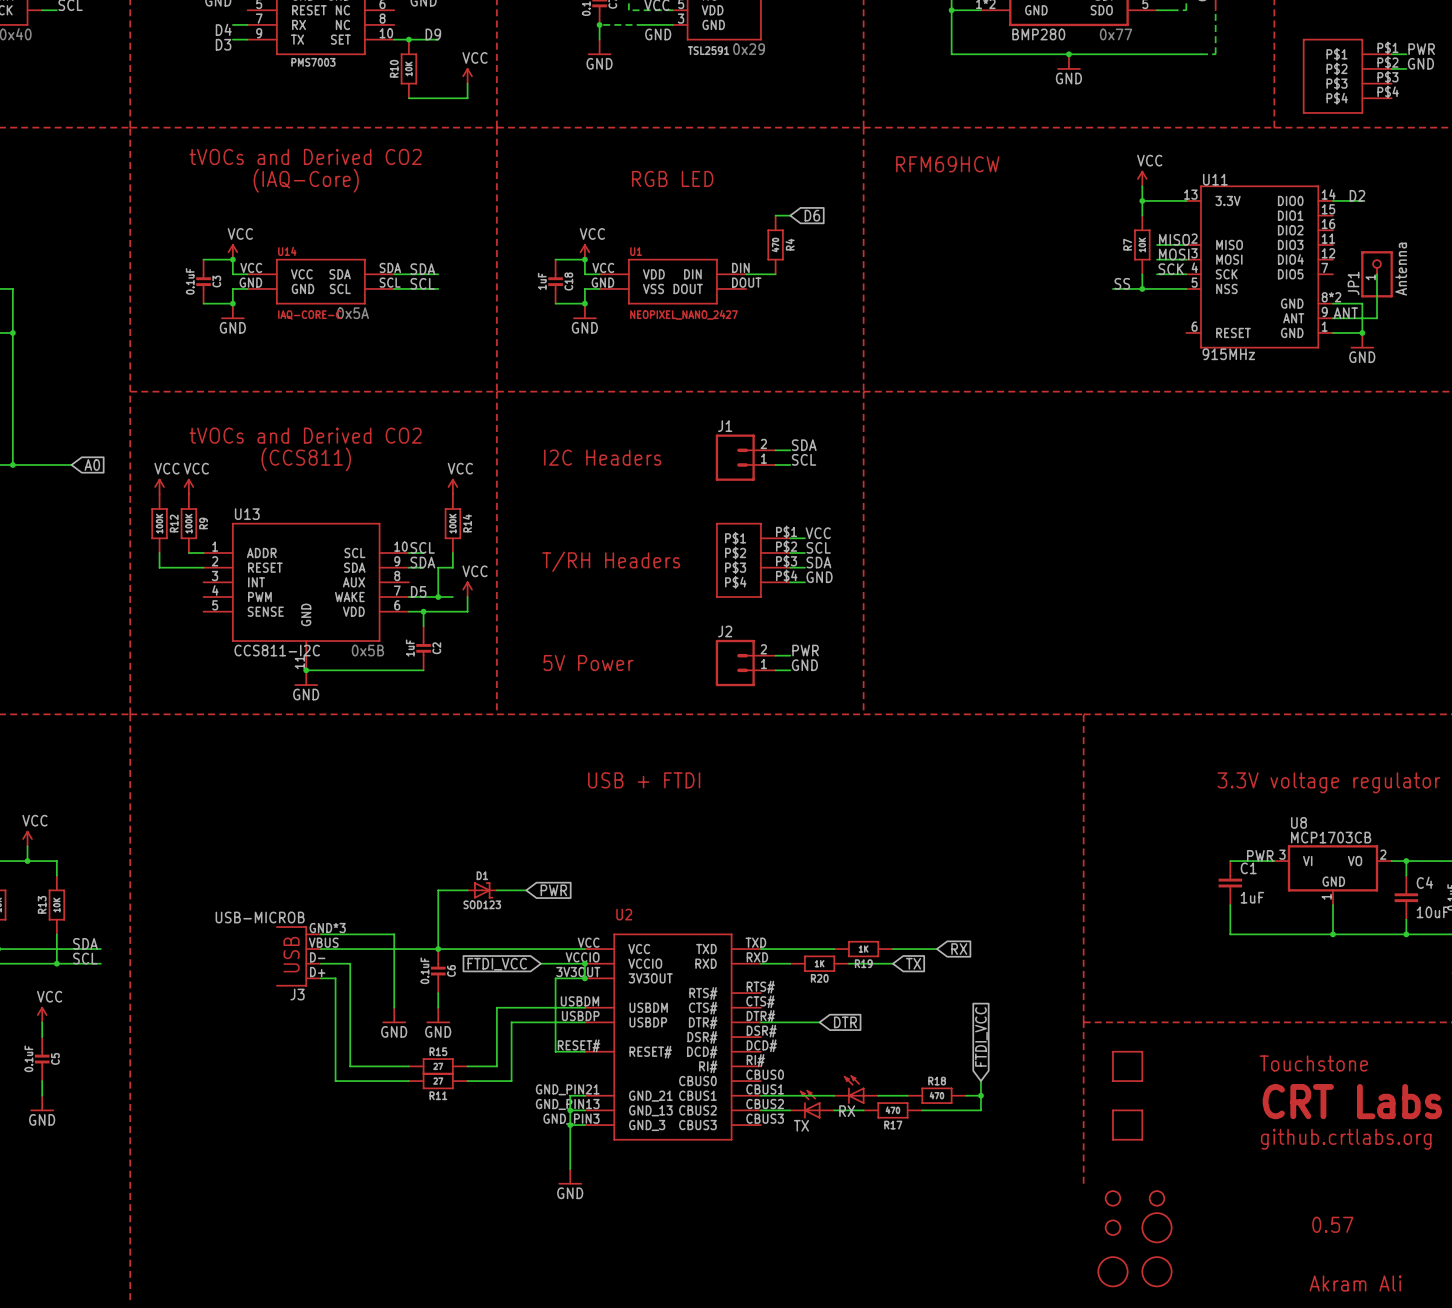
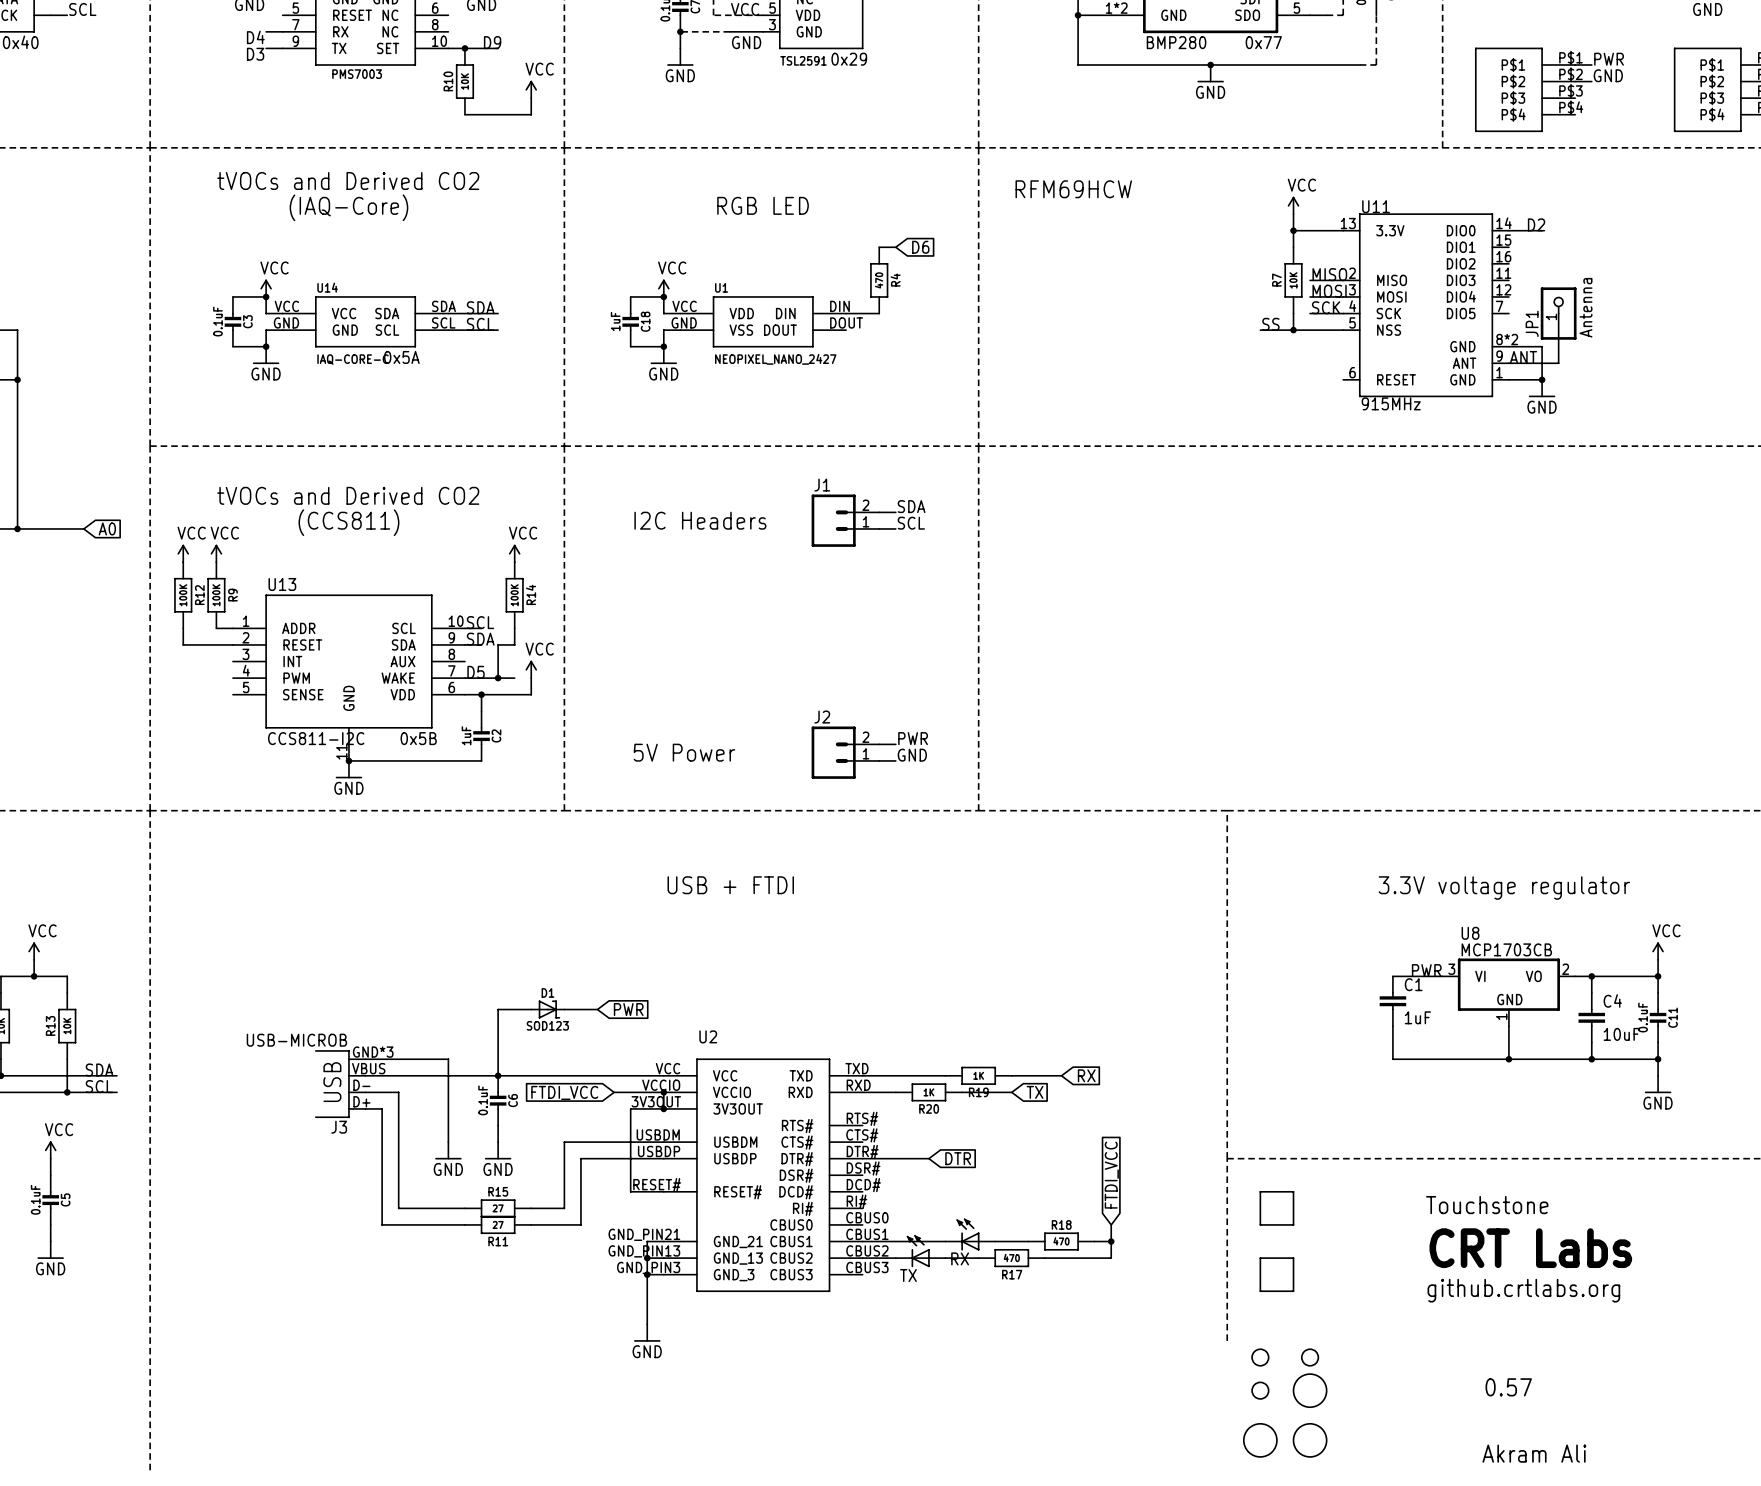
text position: I2C Headers (602, 457) -> I2C Headers (700, 520)
label: VCC (818, 533) -> none
wire: (790, 538) (804, 538) -> none
label: SCL (818, 547) -> none
wire: (790, 553) (804, 553) -> none
part: (753, 560) -> none
text: T/RH Headers (611, 561) -> none
label: SDA (818, 562) -> none
wire: (790, 567) (804, 567) -> none
label: GND (819, 577) -> none
wire: (790, 582) (804, 582) -> none
text position: 5V Power (588, 663) -> 5V Power (684, 752)

